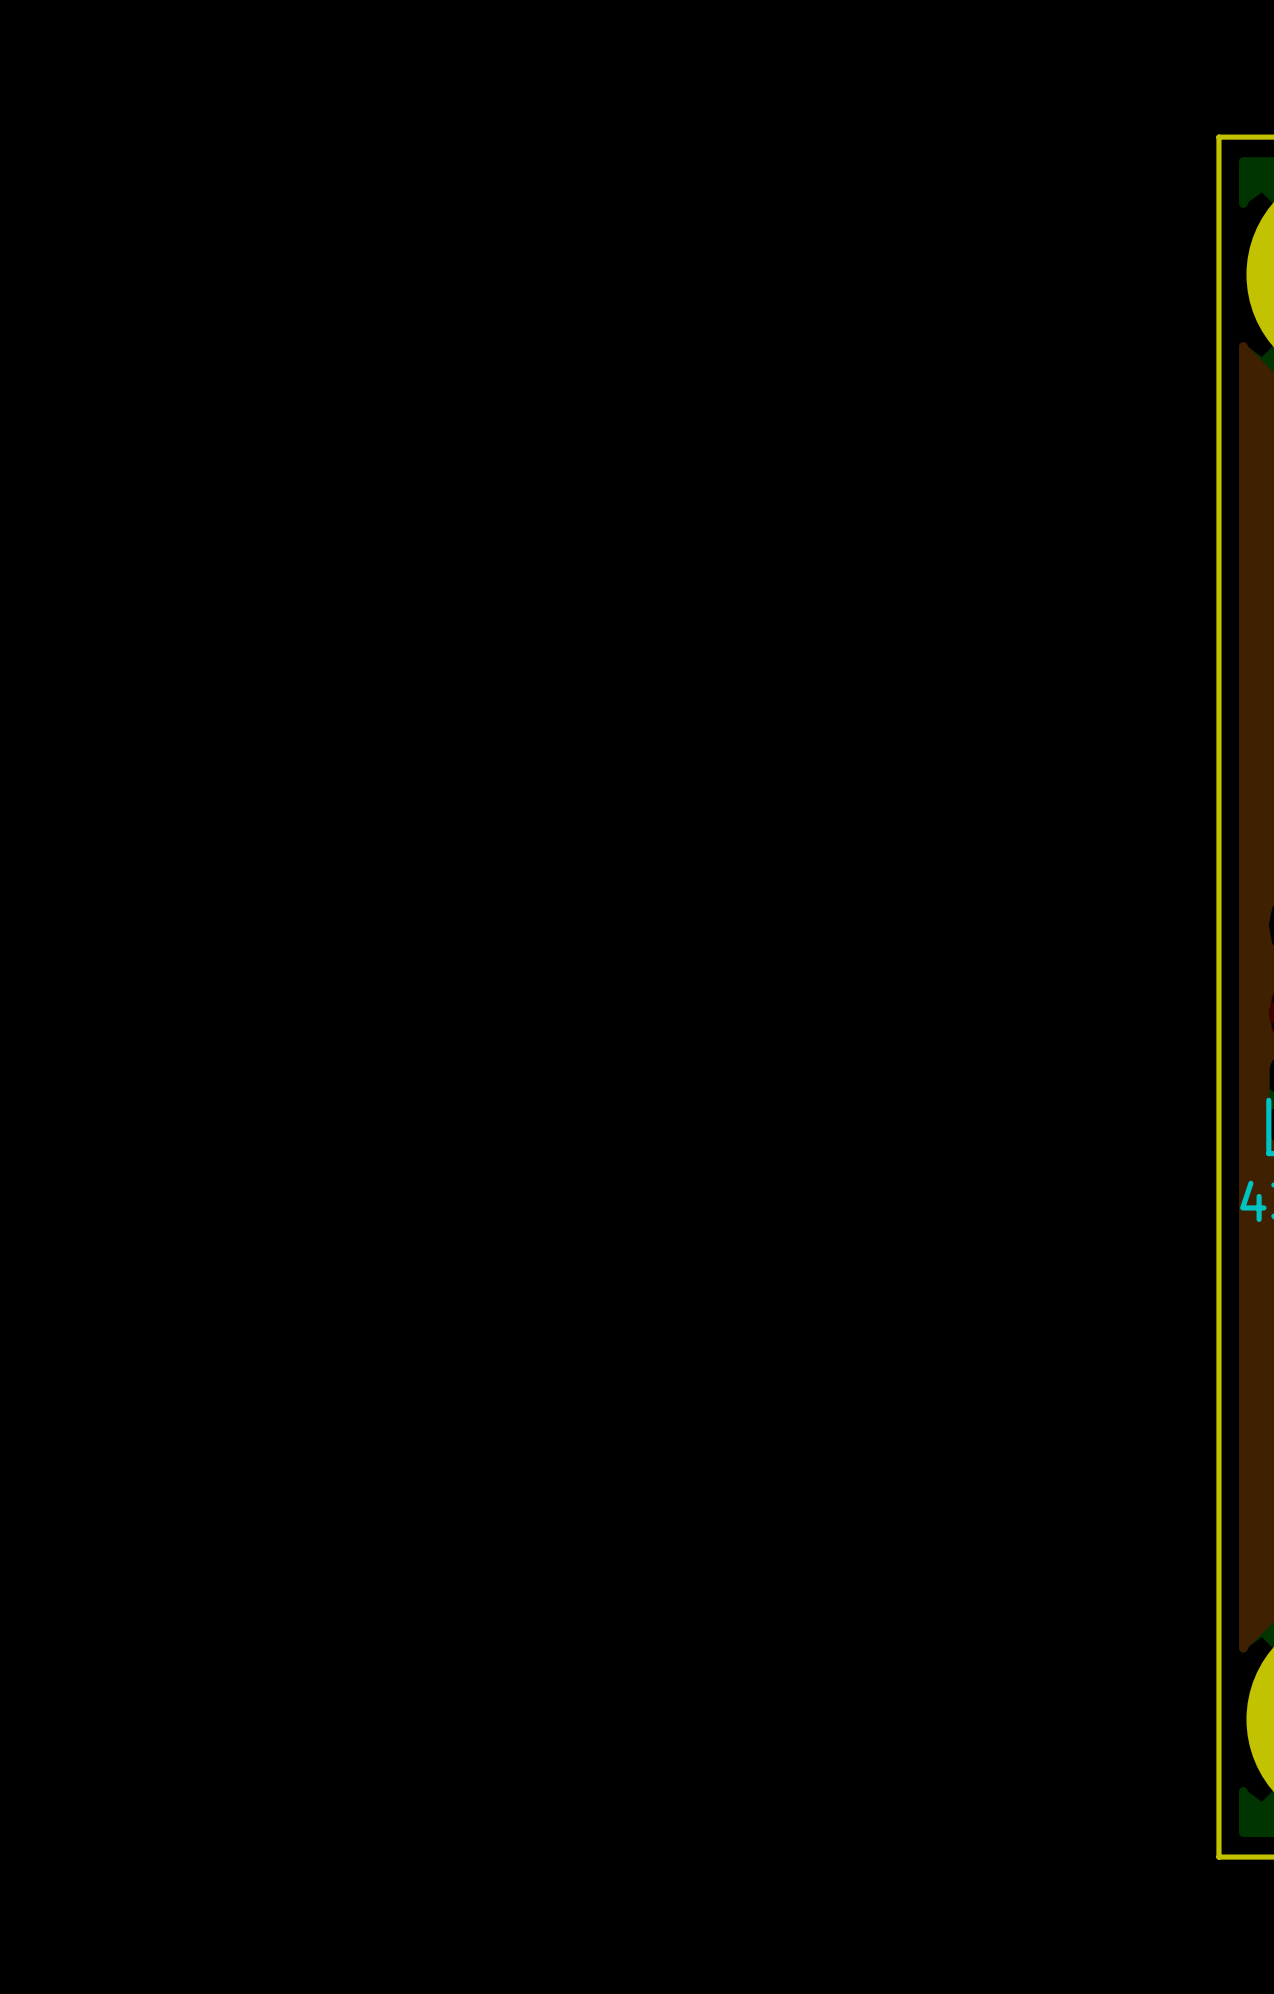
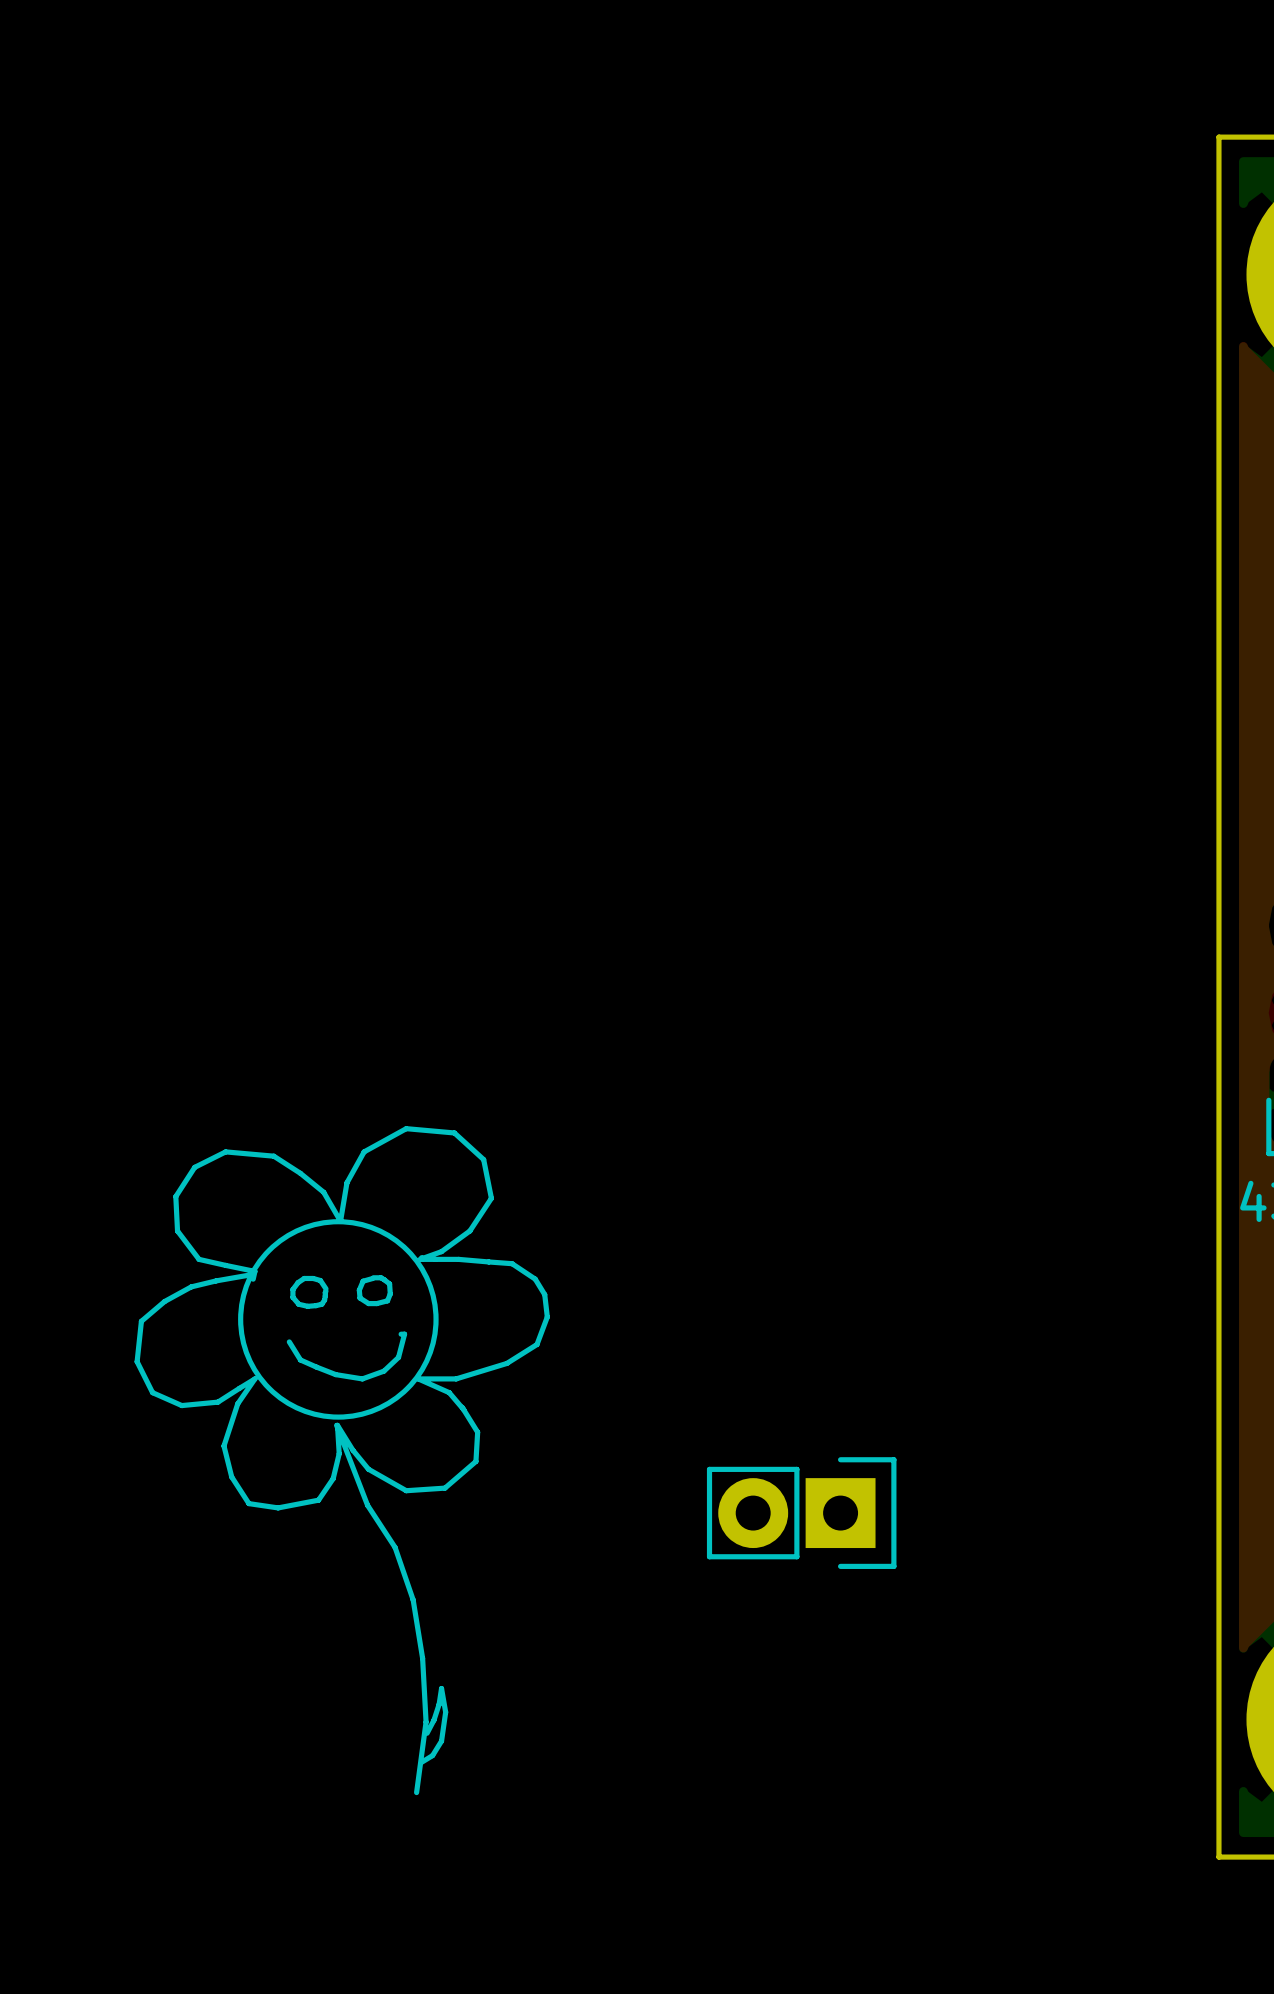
drawing: none -> [134, 1126, 550, 1796]
part: none -> (801, 1513)

